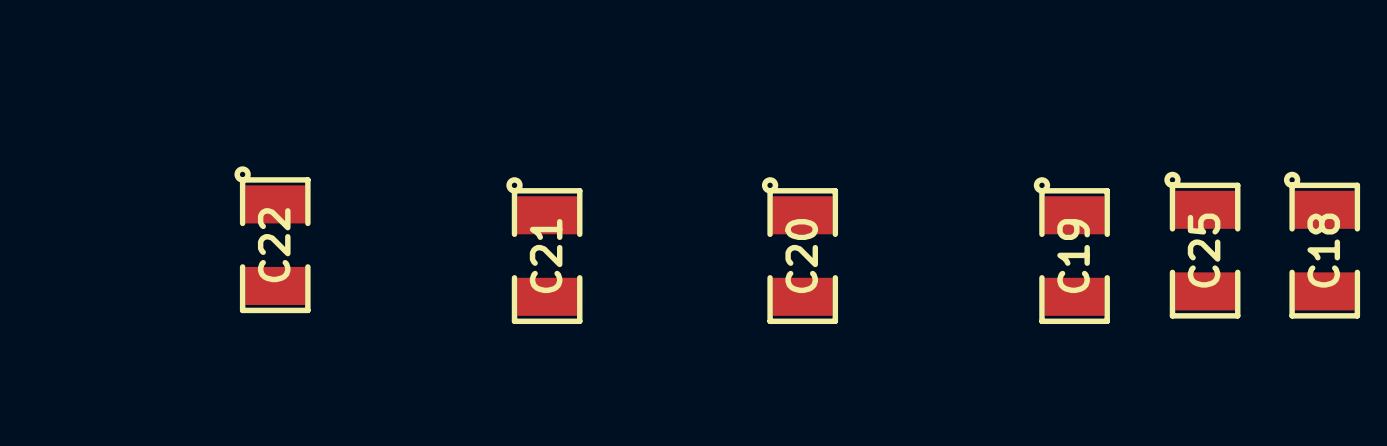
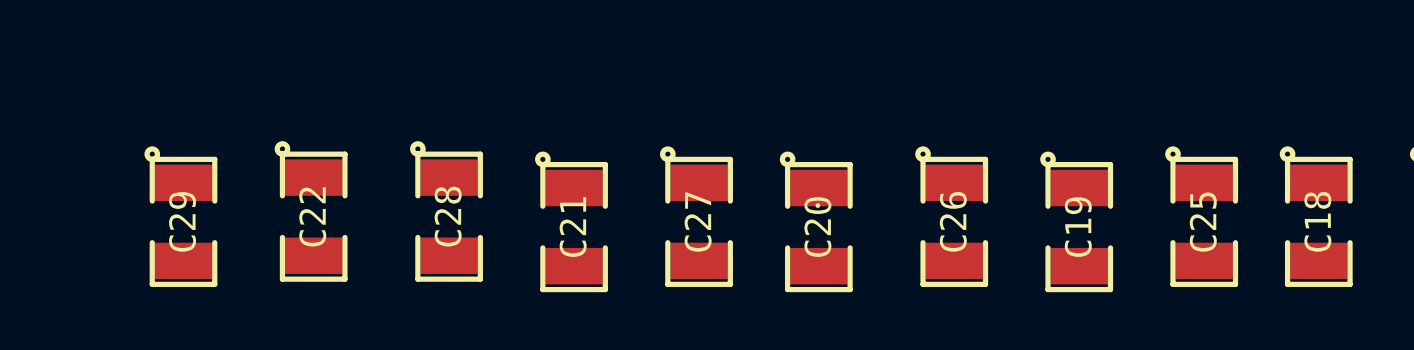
C28: none -> (446, 211)
C29: none -> (180, 216)
C27: none -> (696, 216)
C26: none -> (951, 216)

